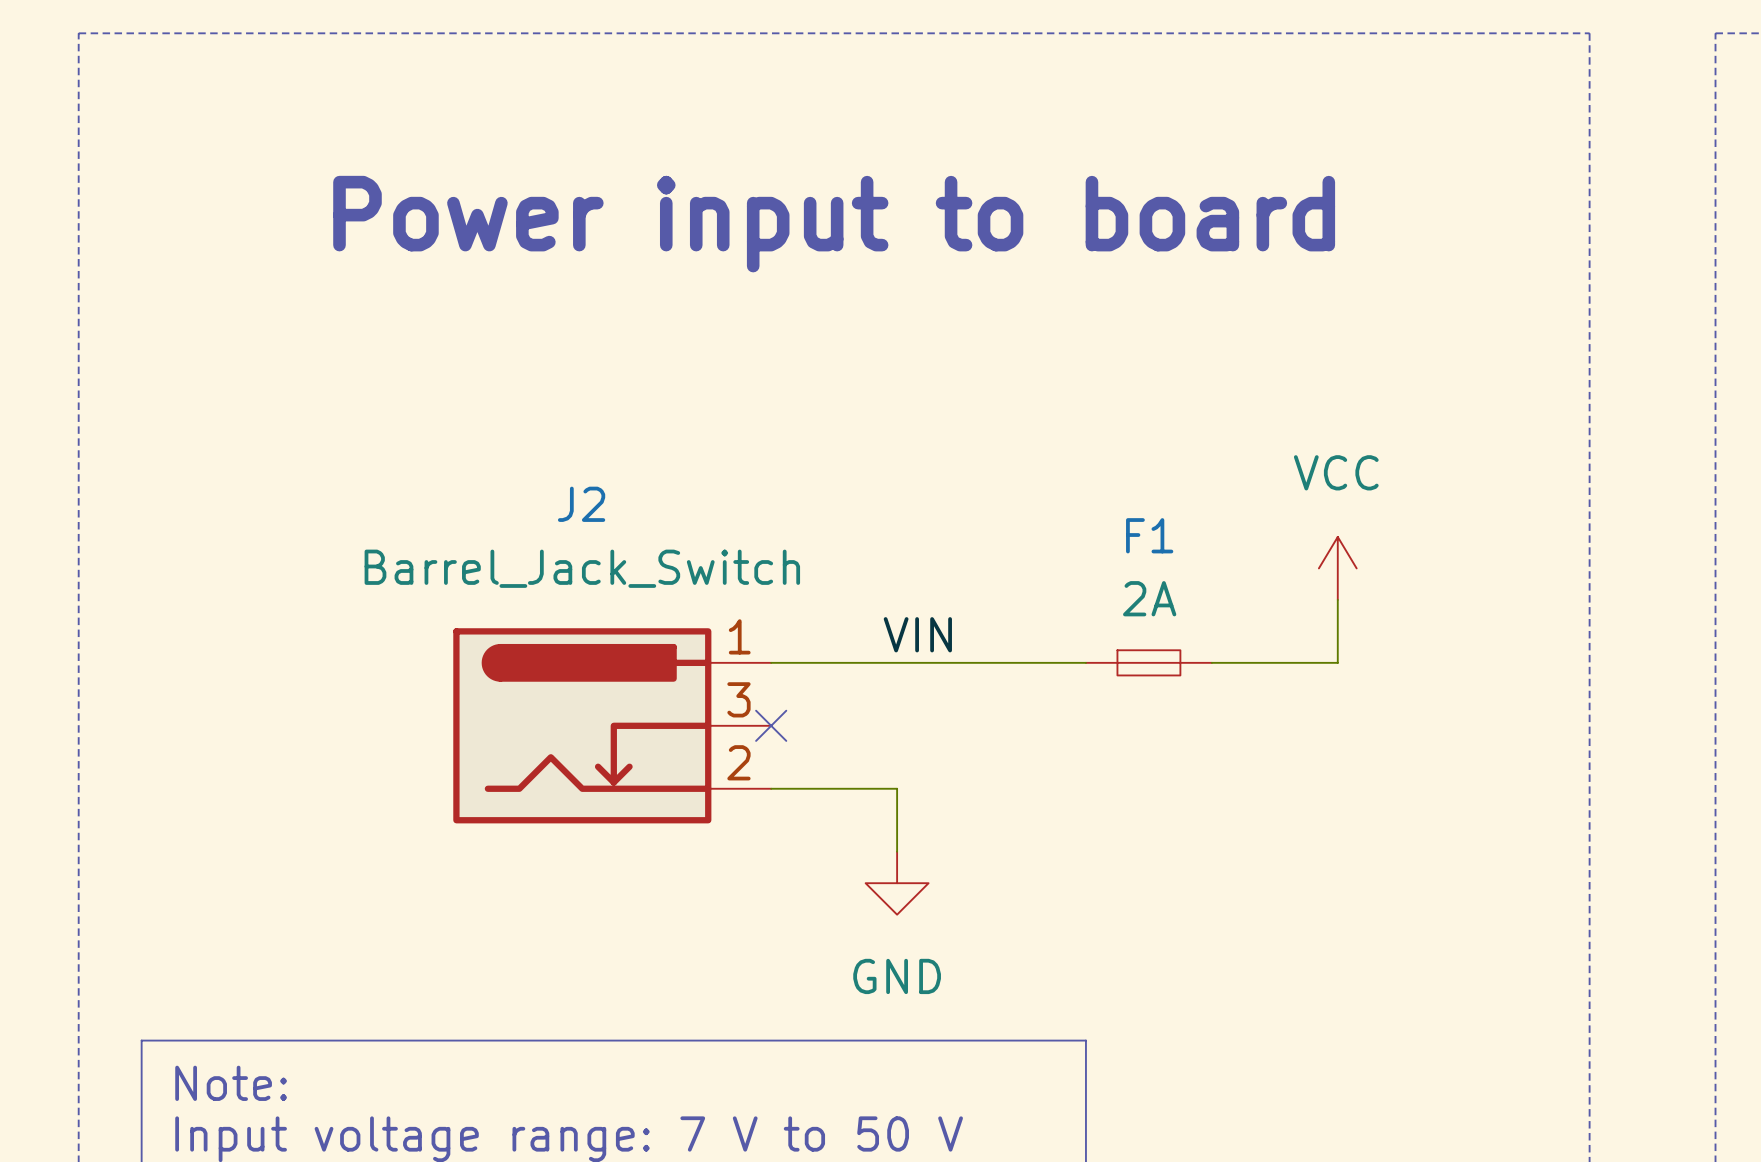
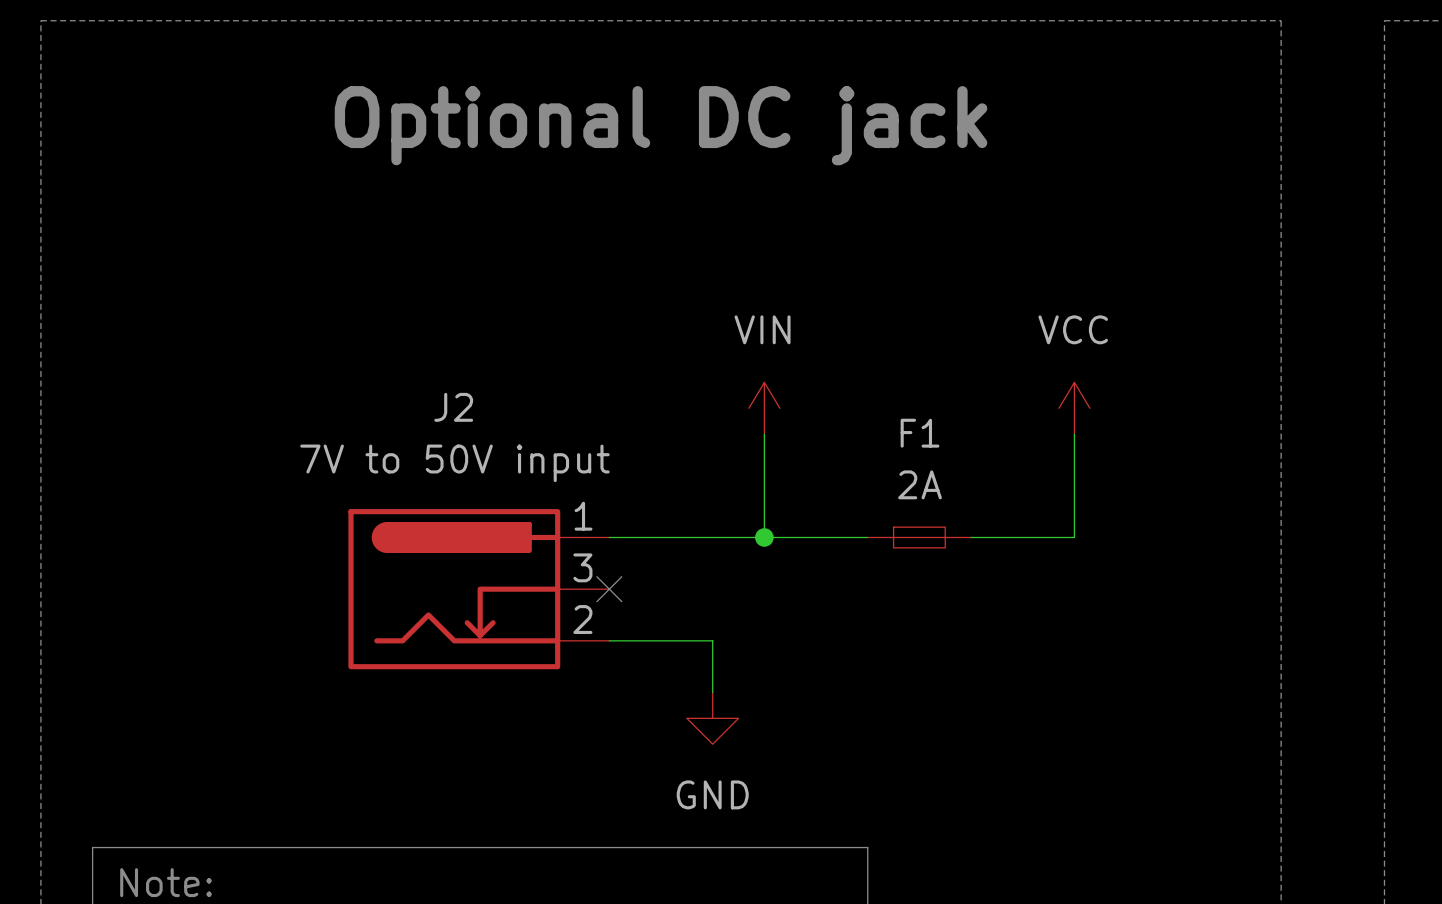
text: none -> Optional DC jack (661, 125)
text: Power input to board (834, 224) -> none
power symbol: none -> VIN (764, 408)
wire: none -> (764, 434) (764, 537)
J2 value: Barrel_Jack_Switch (582, 568) -> 7V to 50V input (454, 463)
power symbol position: VCC (1337, 568) -> VCC (1074, 408)
label: VIN (917, 634) -> none
junction: none -> (764, 537)

